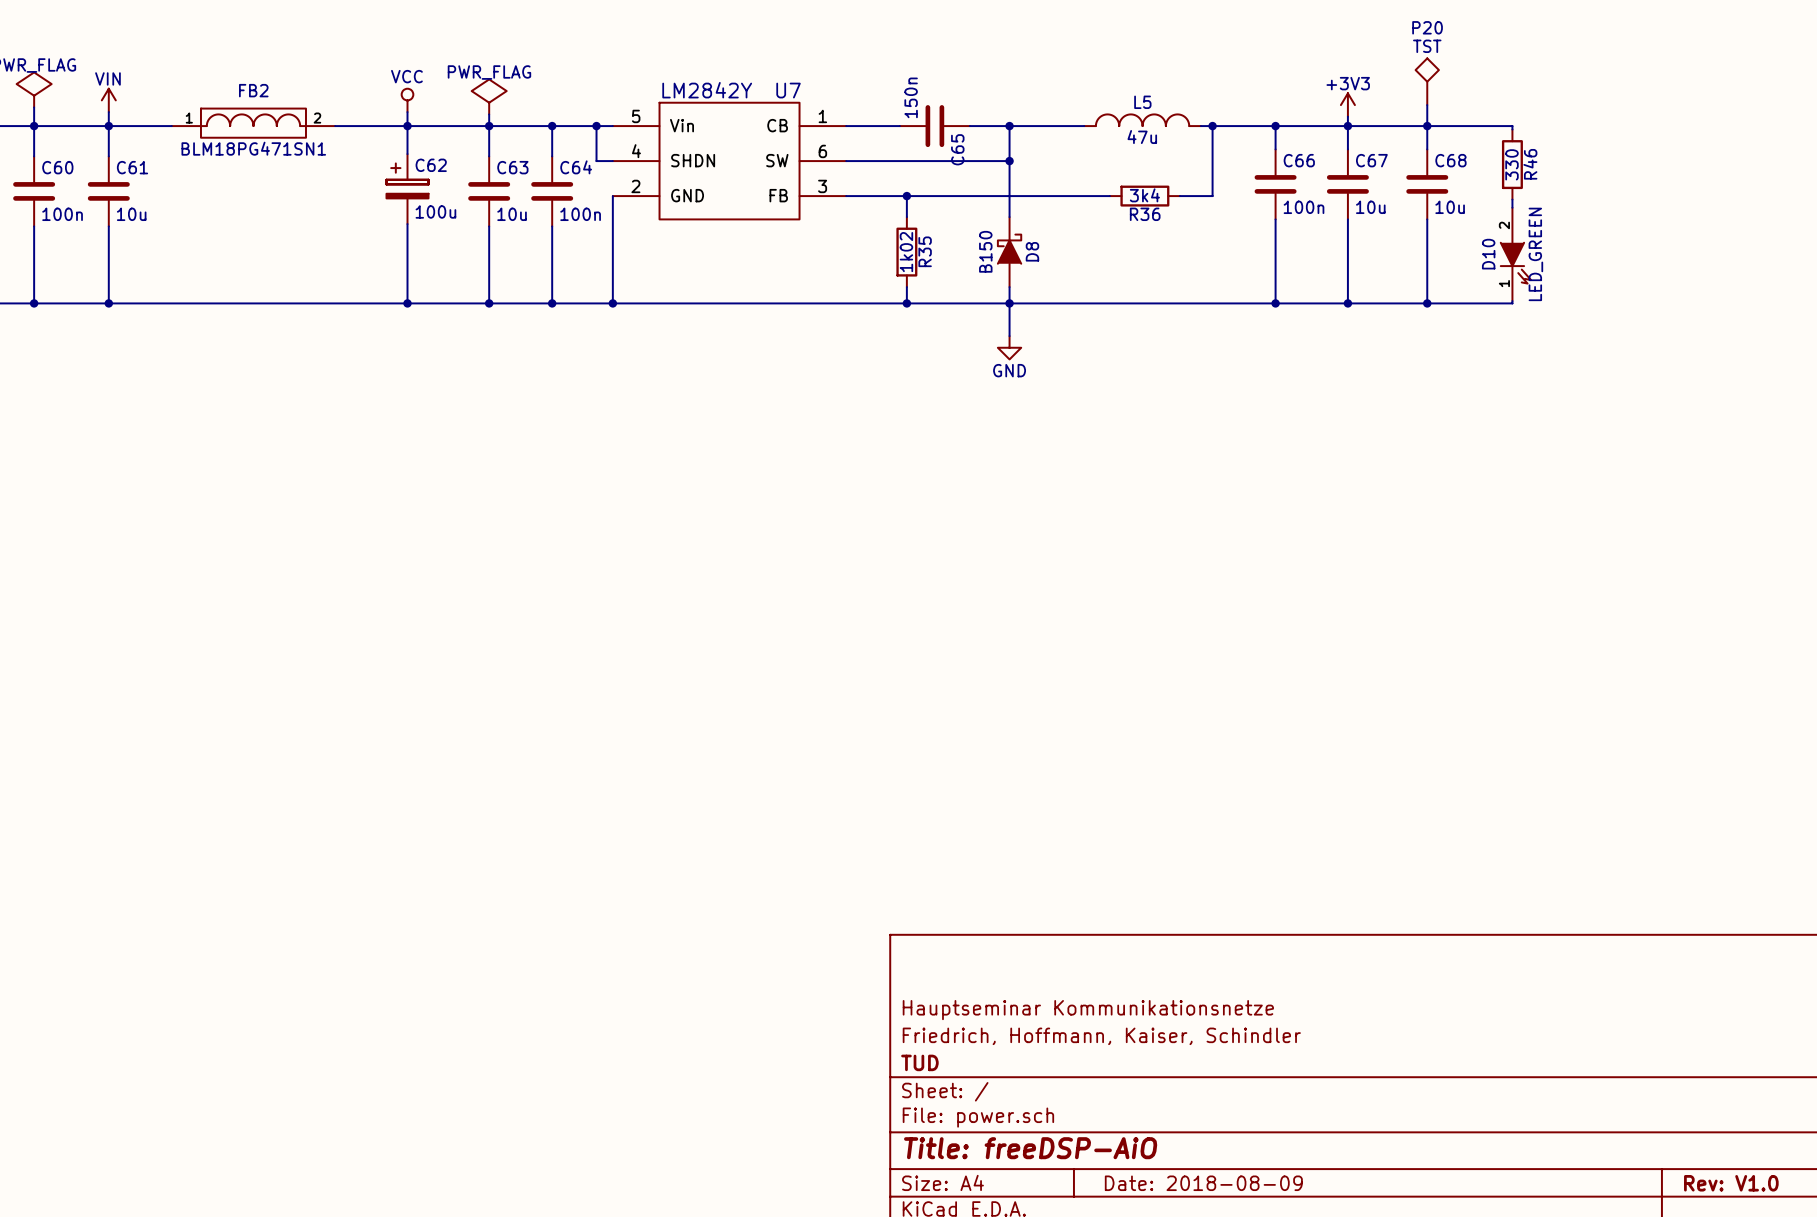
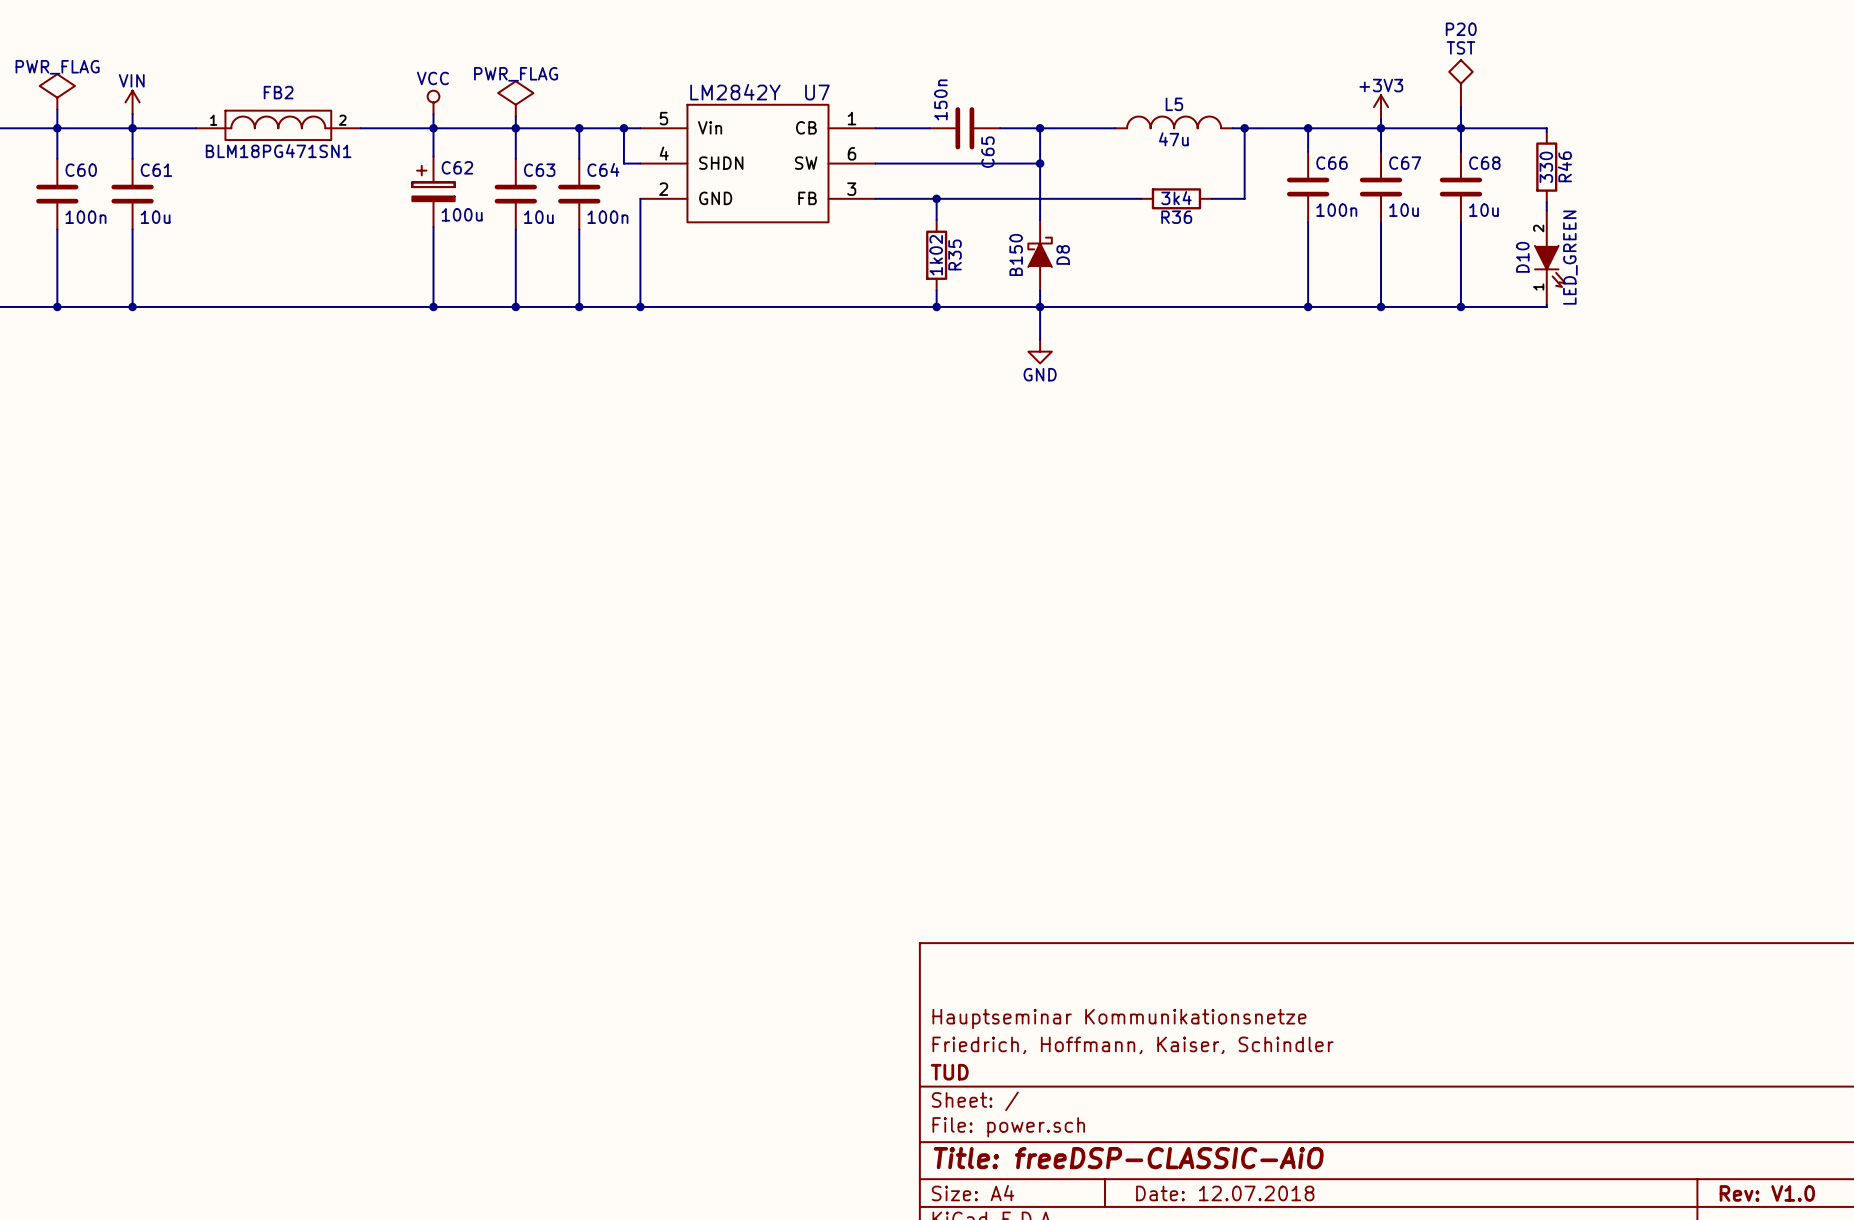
title block: Title: freeDSP-AiO (1030, 1148) -> Title: freeDSP-CLASSIC-AiO (1128, 1158)
title block: Date: 2018-08-09 (1203, 1183) -> Date: 12.07.2018 (1225, 1193)

